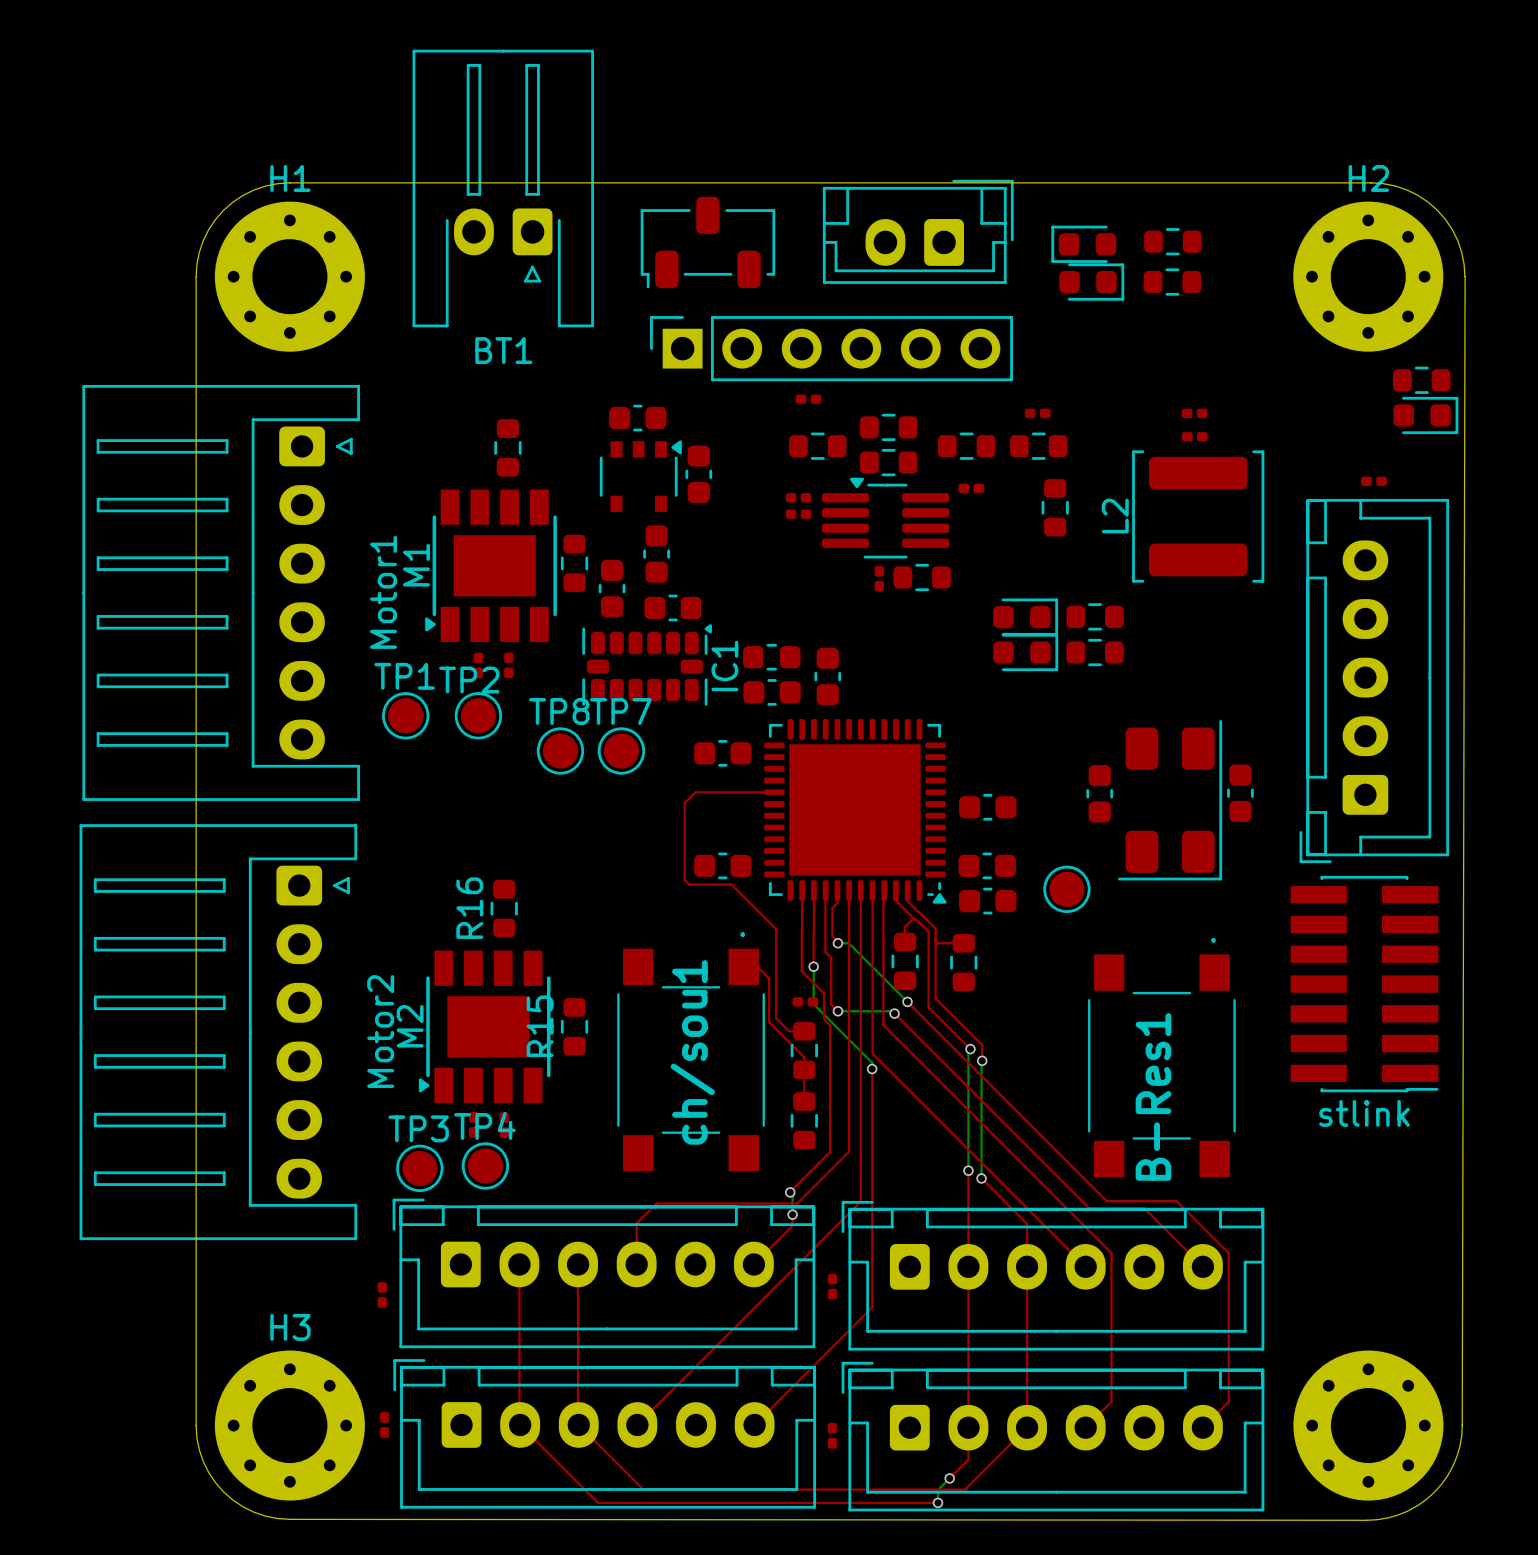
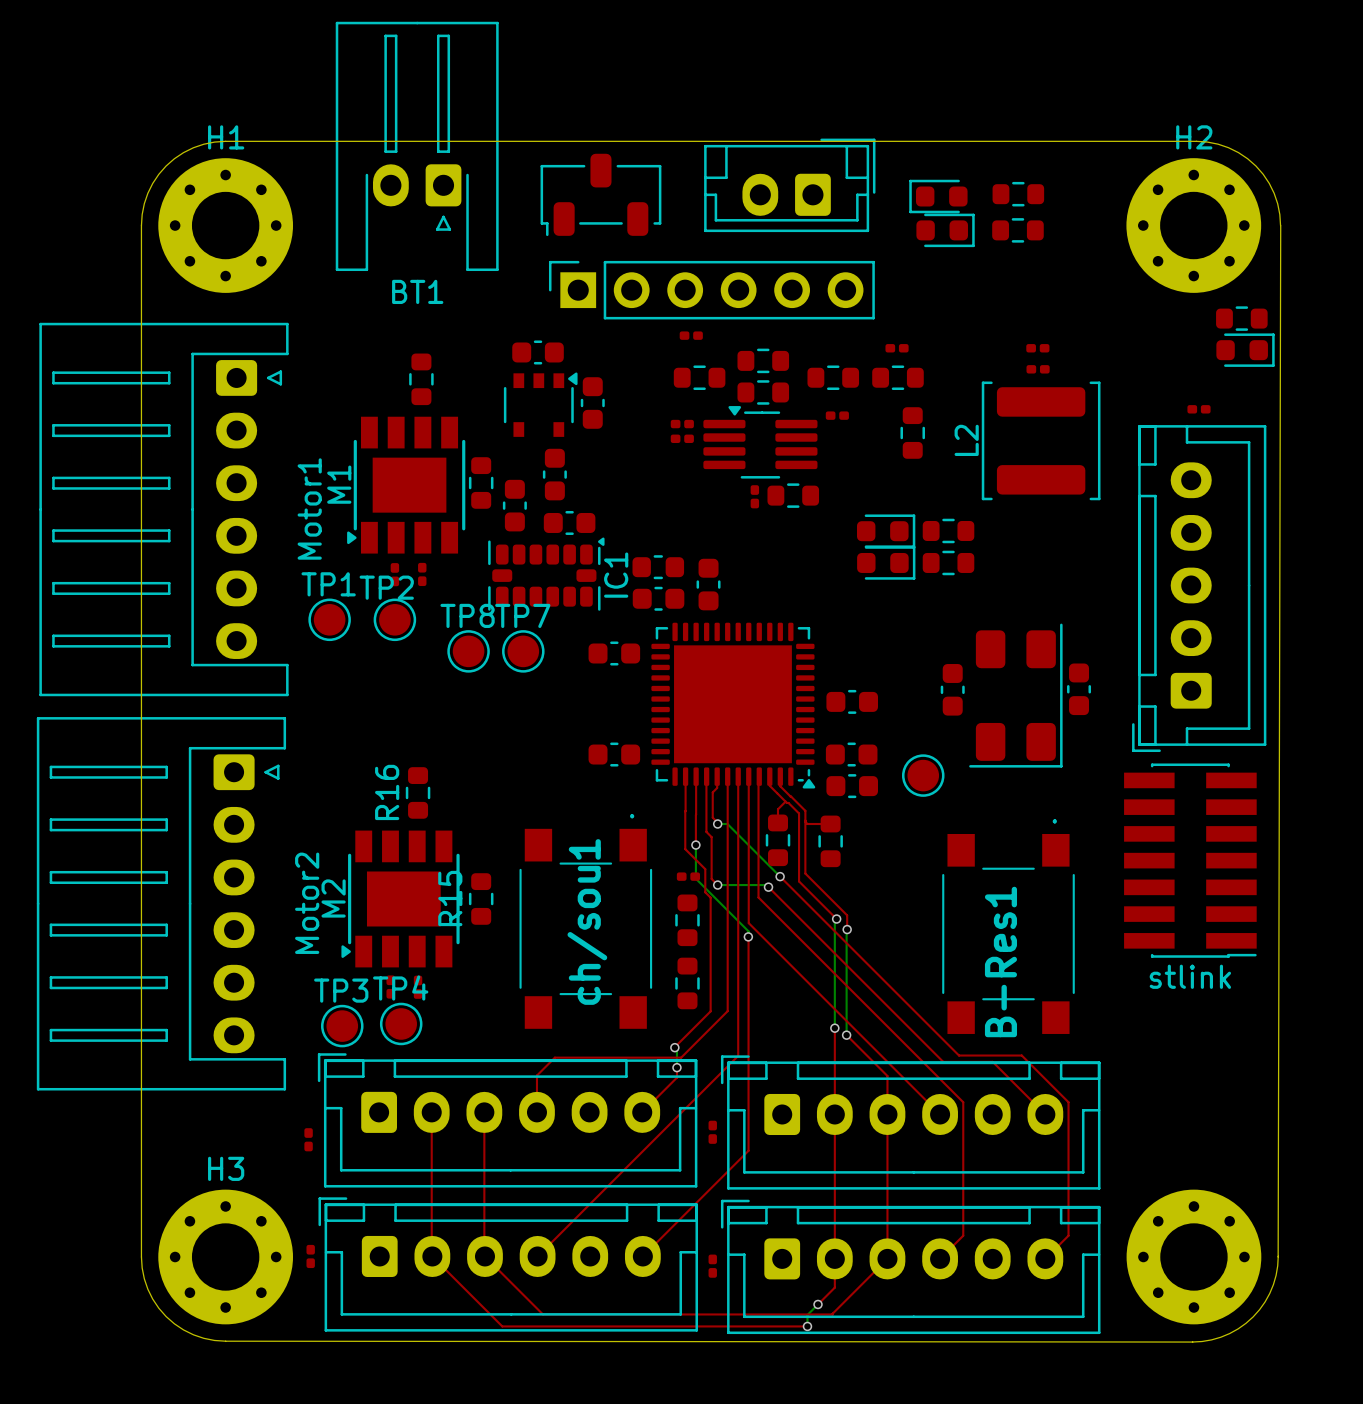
top track: (774, 792) (695, 792) (684, 803) (684, 879) (689, 884) (731, 884) (776, 929) (776, 1018) (789, 1031) (804, 1031) -> none
top track: (743, 966) (757, 966) (769, 978) (769, 1022) (804, 1057) (804, 1101) -> none

